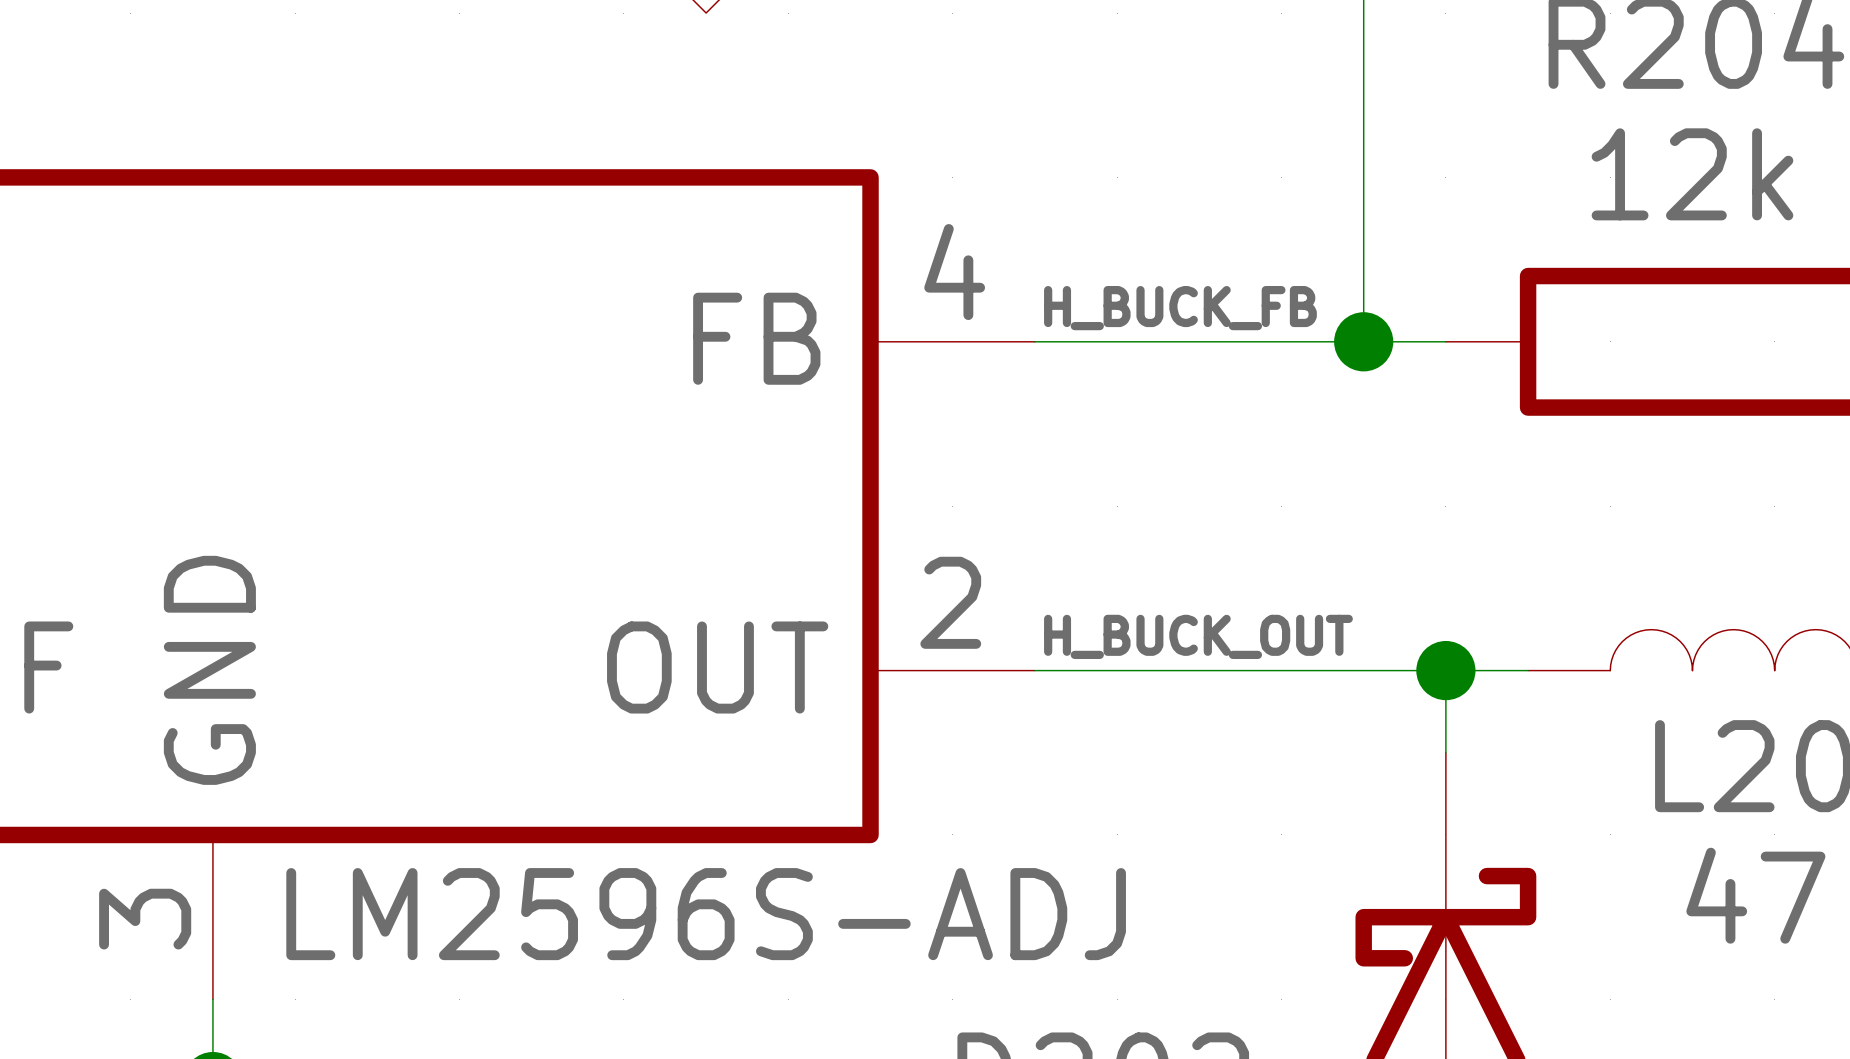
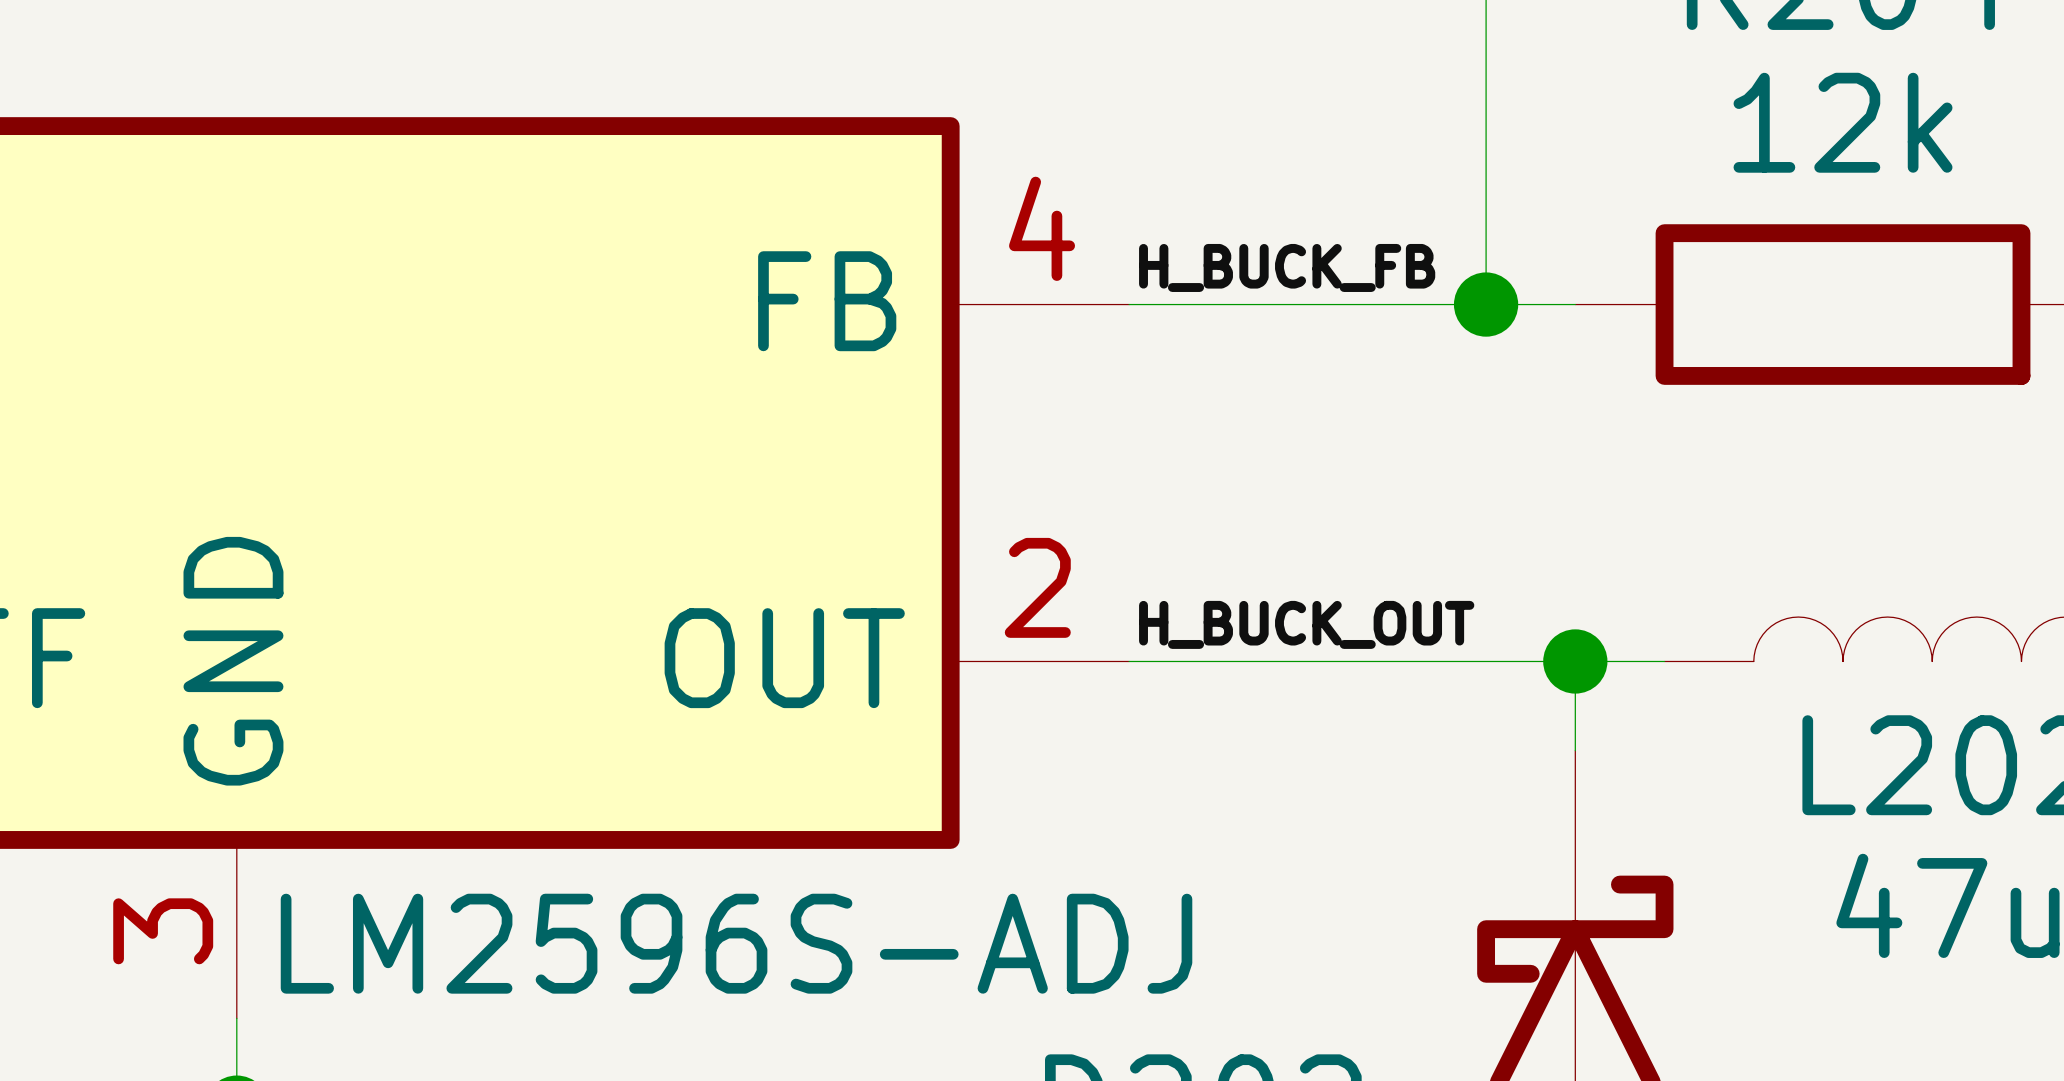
part value position: LM2596S-ADJ (706, 914) -> LM2596S-ADJ (736, 943)

